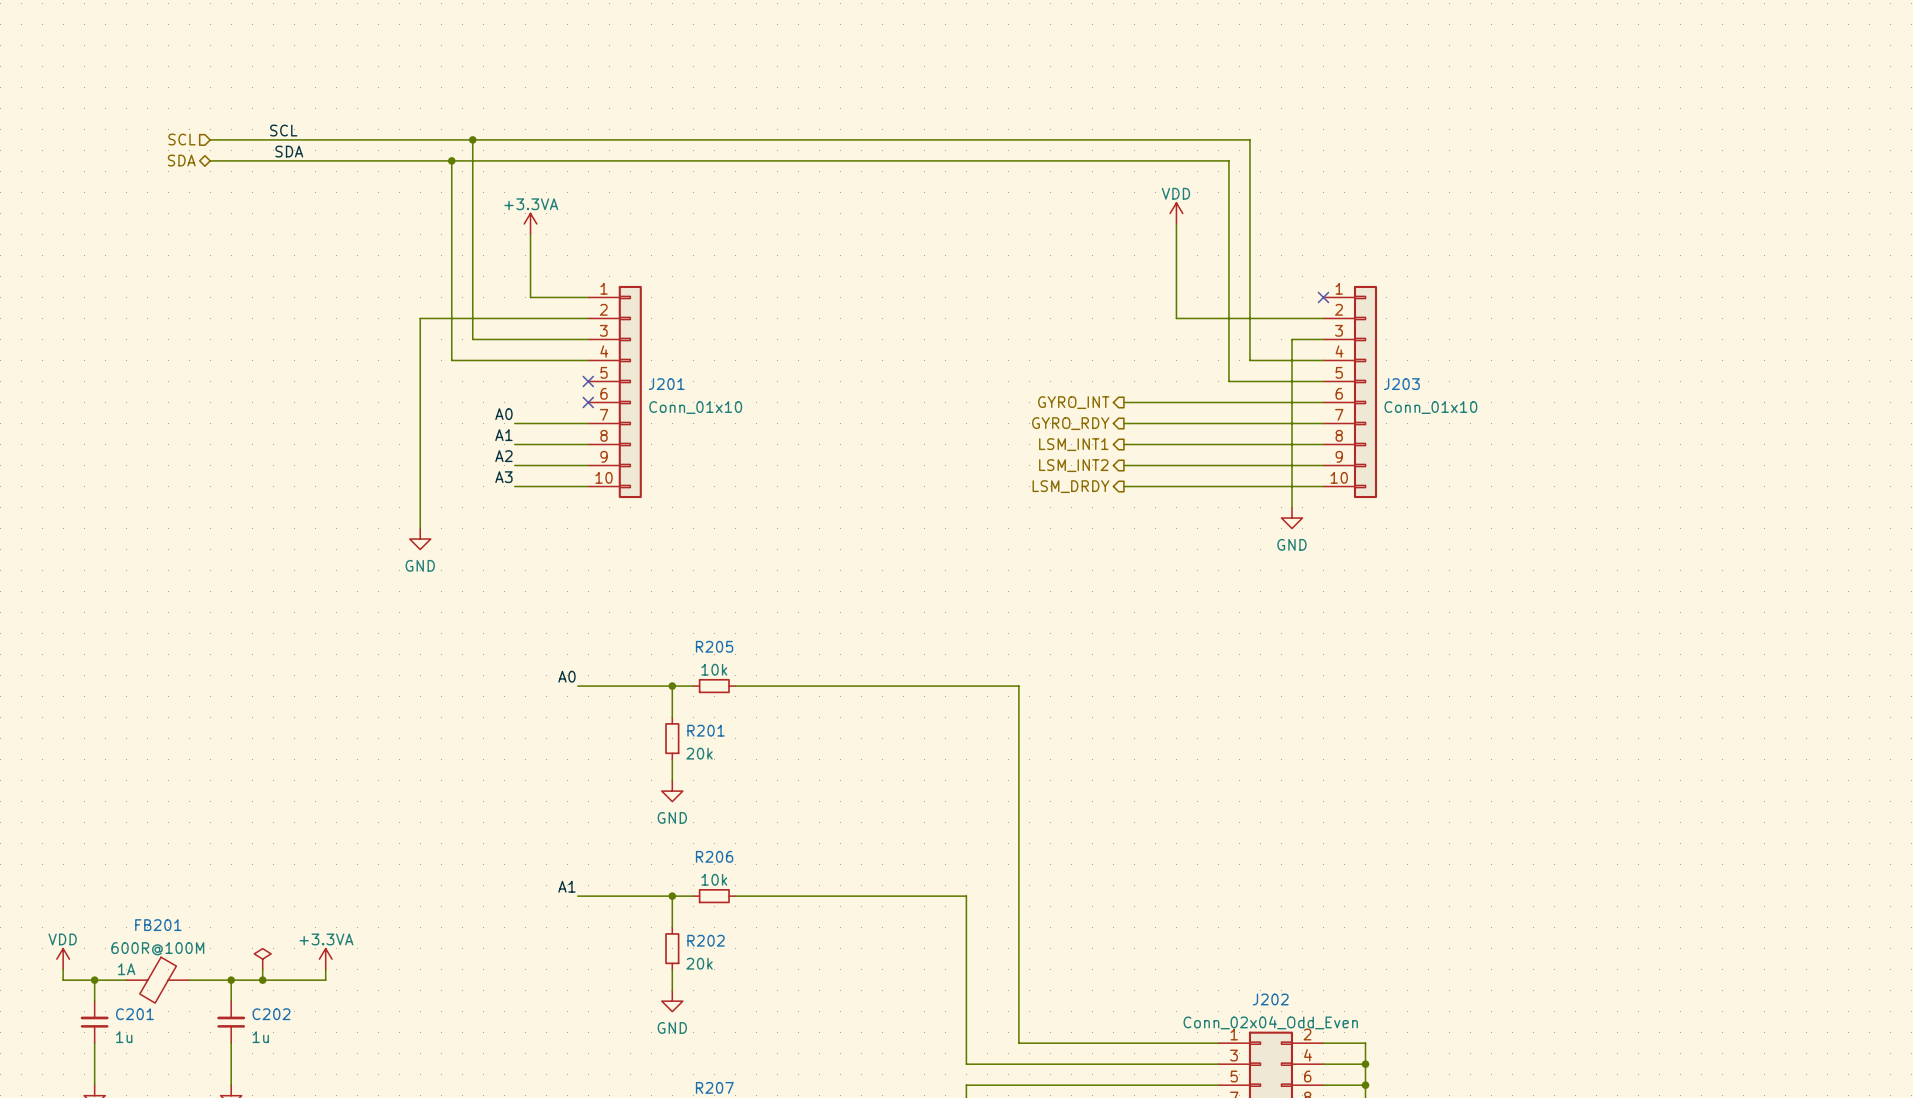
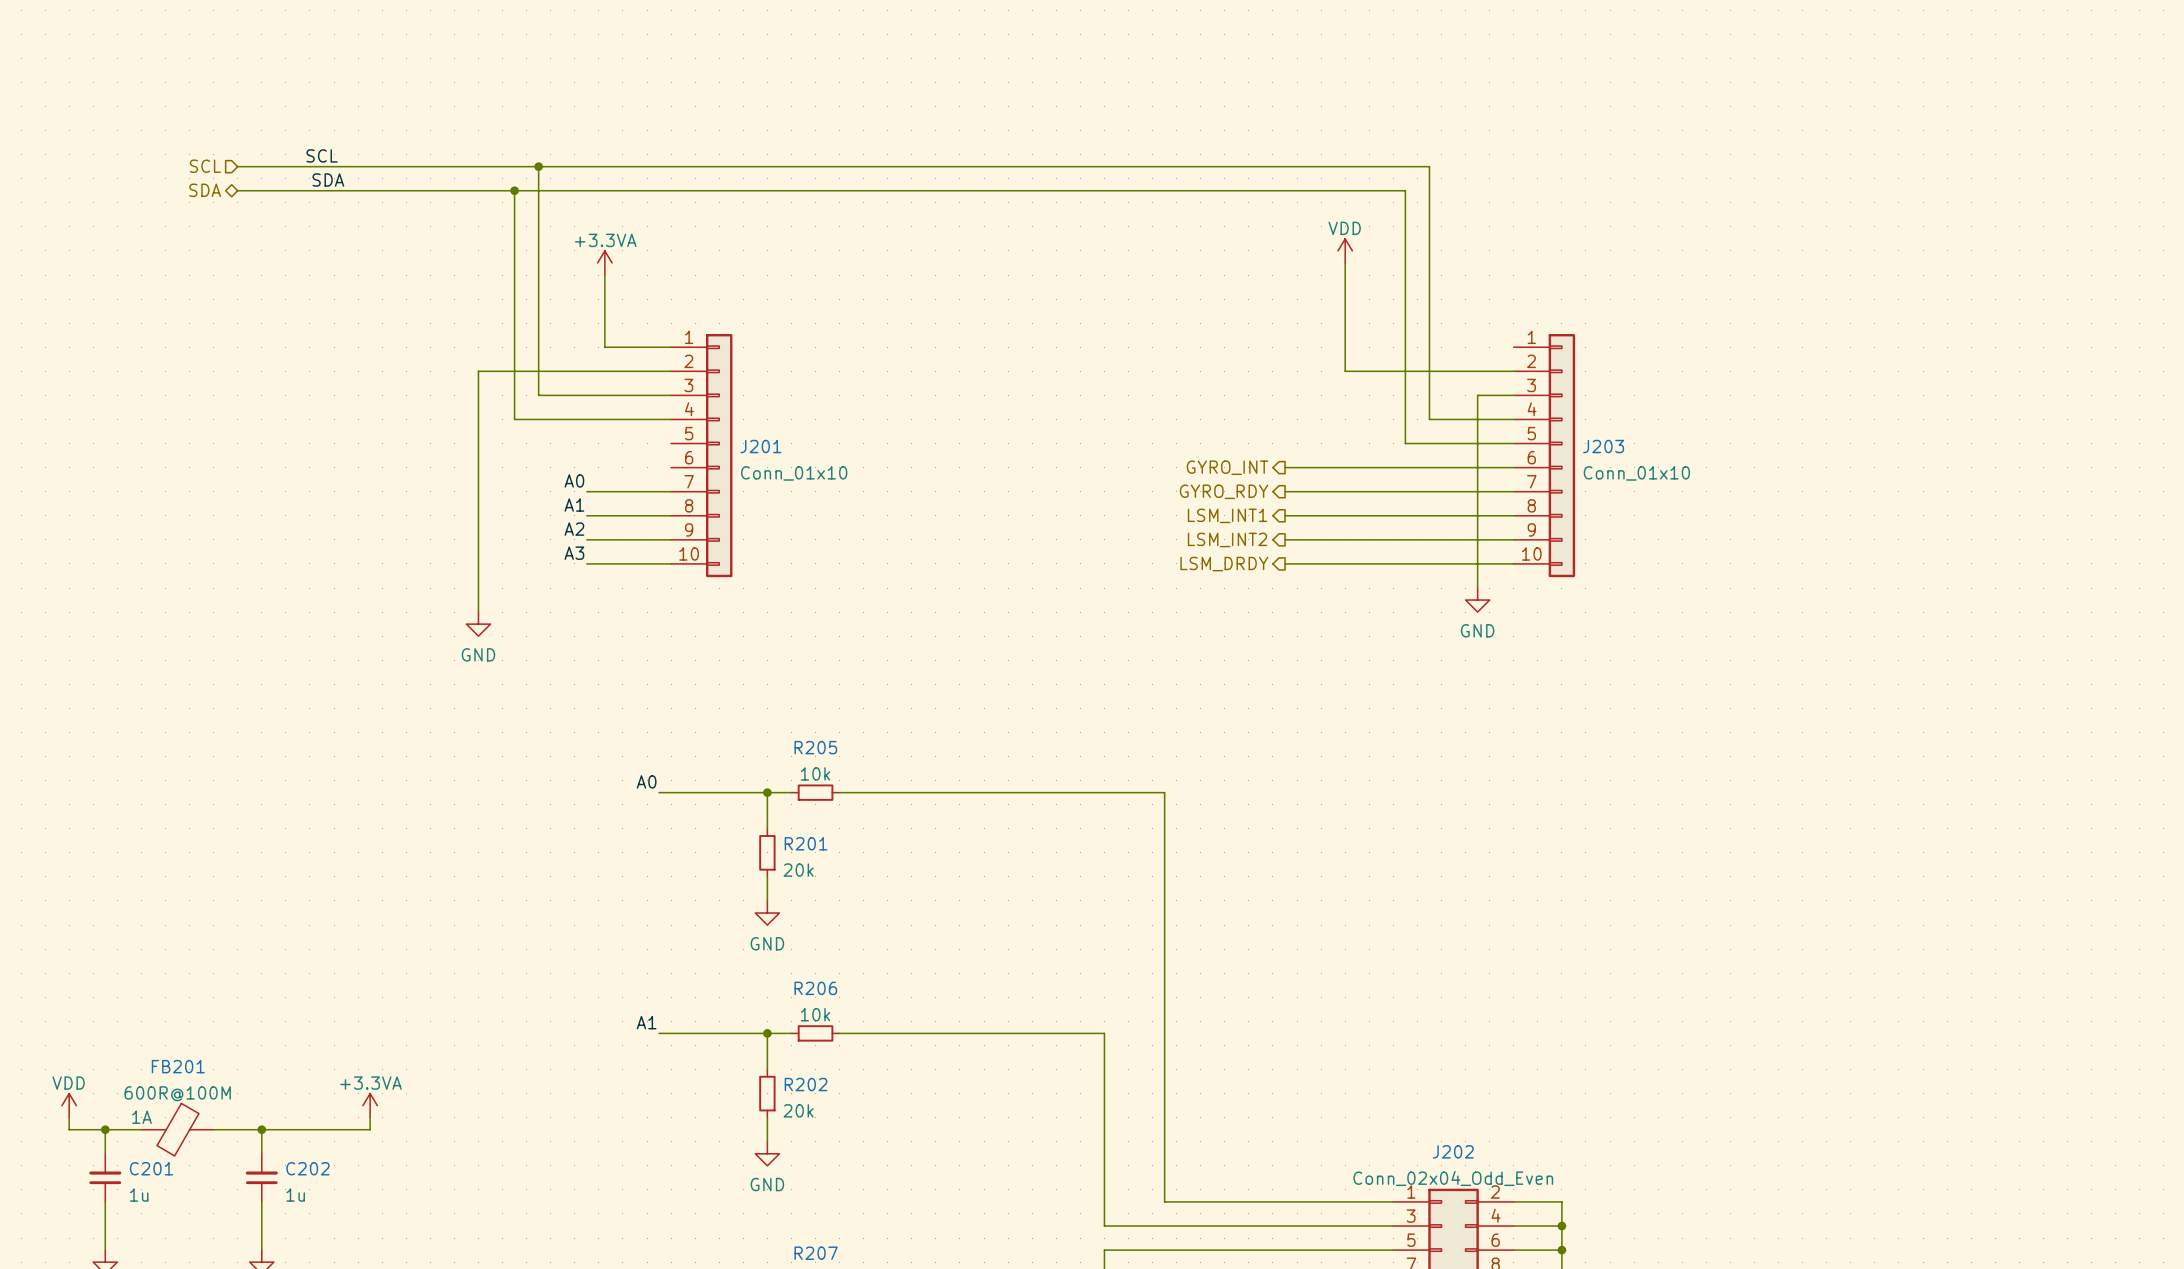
no-connect mark: (1323, 297) -> none
no-connect mark: (588, 381) -> none
no-connect mark: (588, 402) -> none
power symbol: (262, 959) -> none
wire: (262, 969) (262, 980) -> none
junction: (262, 980) -> none

